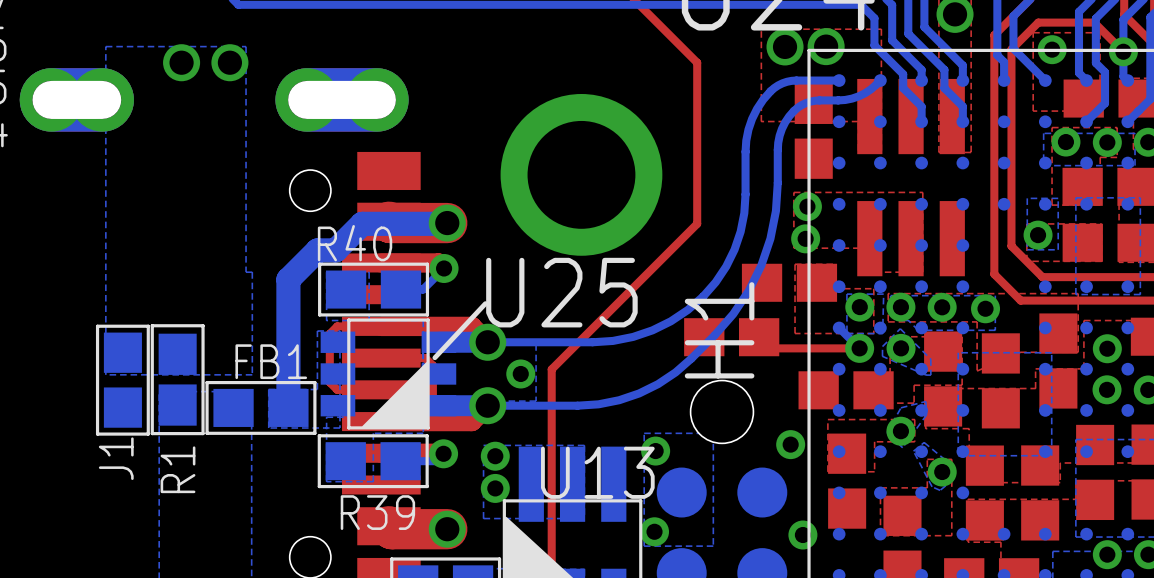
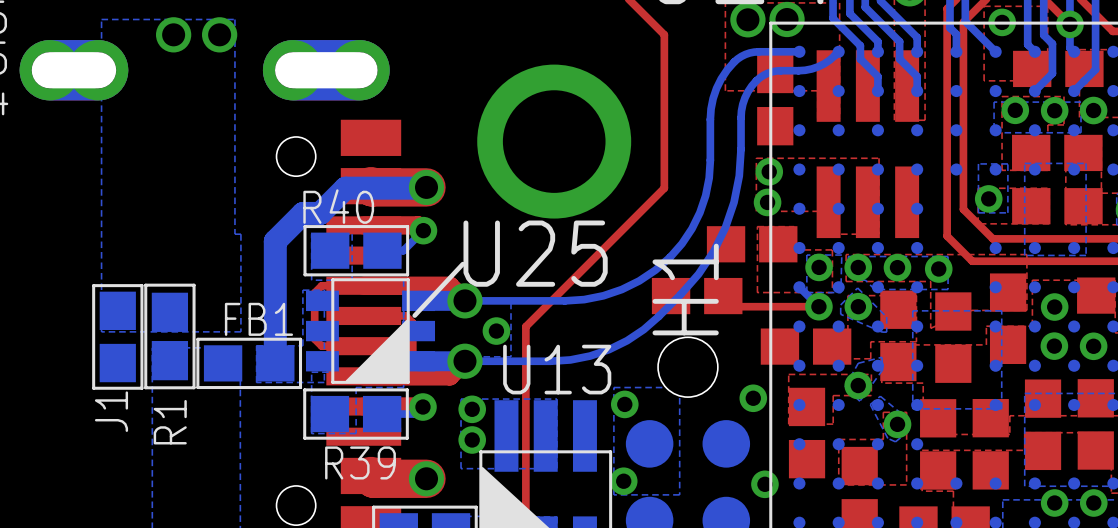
U13 name position: U13 (597, 472) -> U13 (557, 369)

